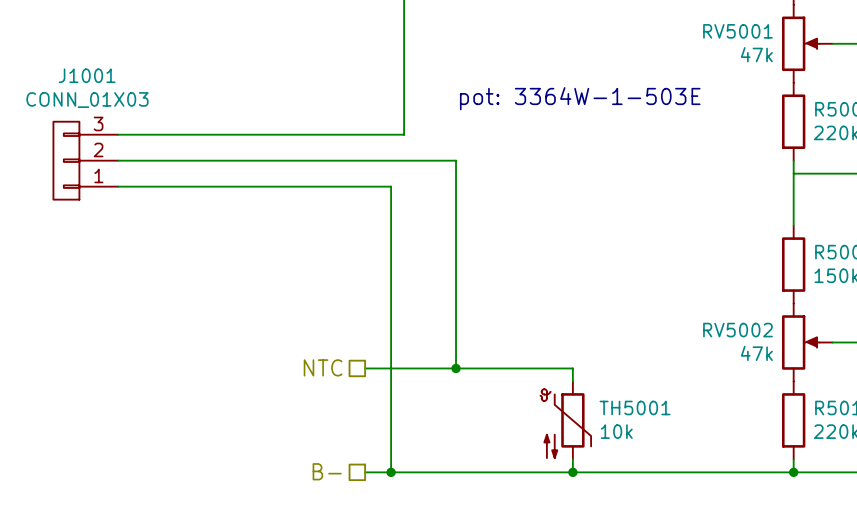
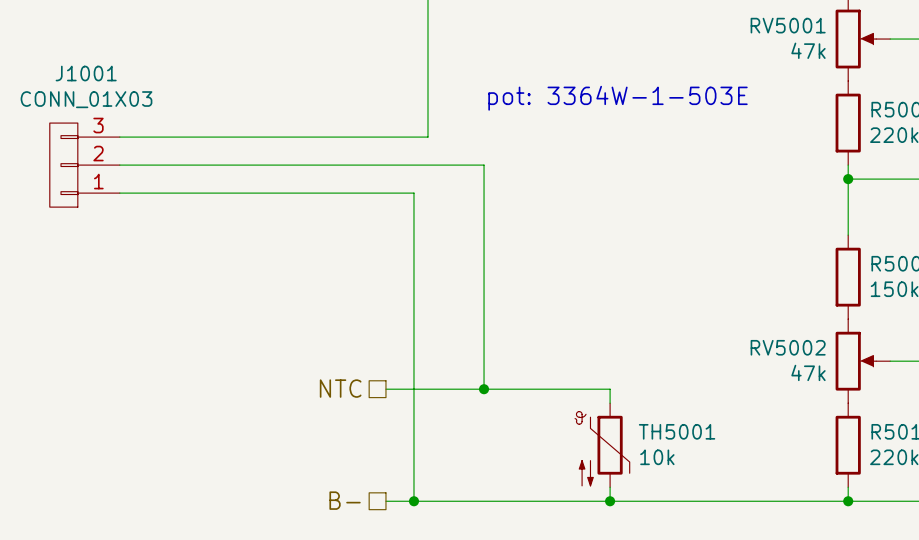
junction: none -> (848, 179)

